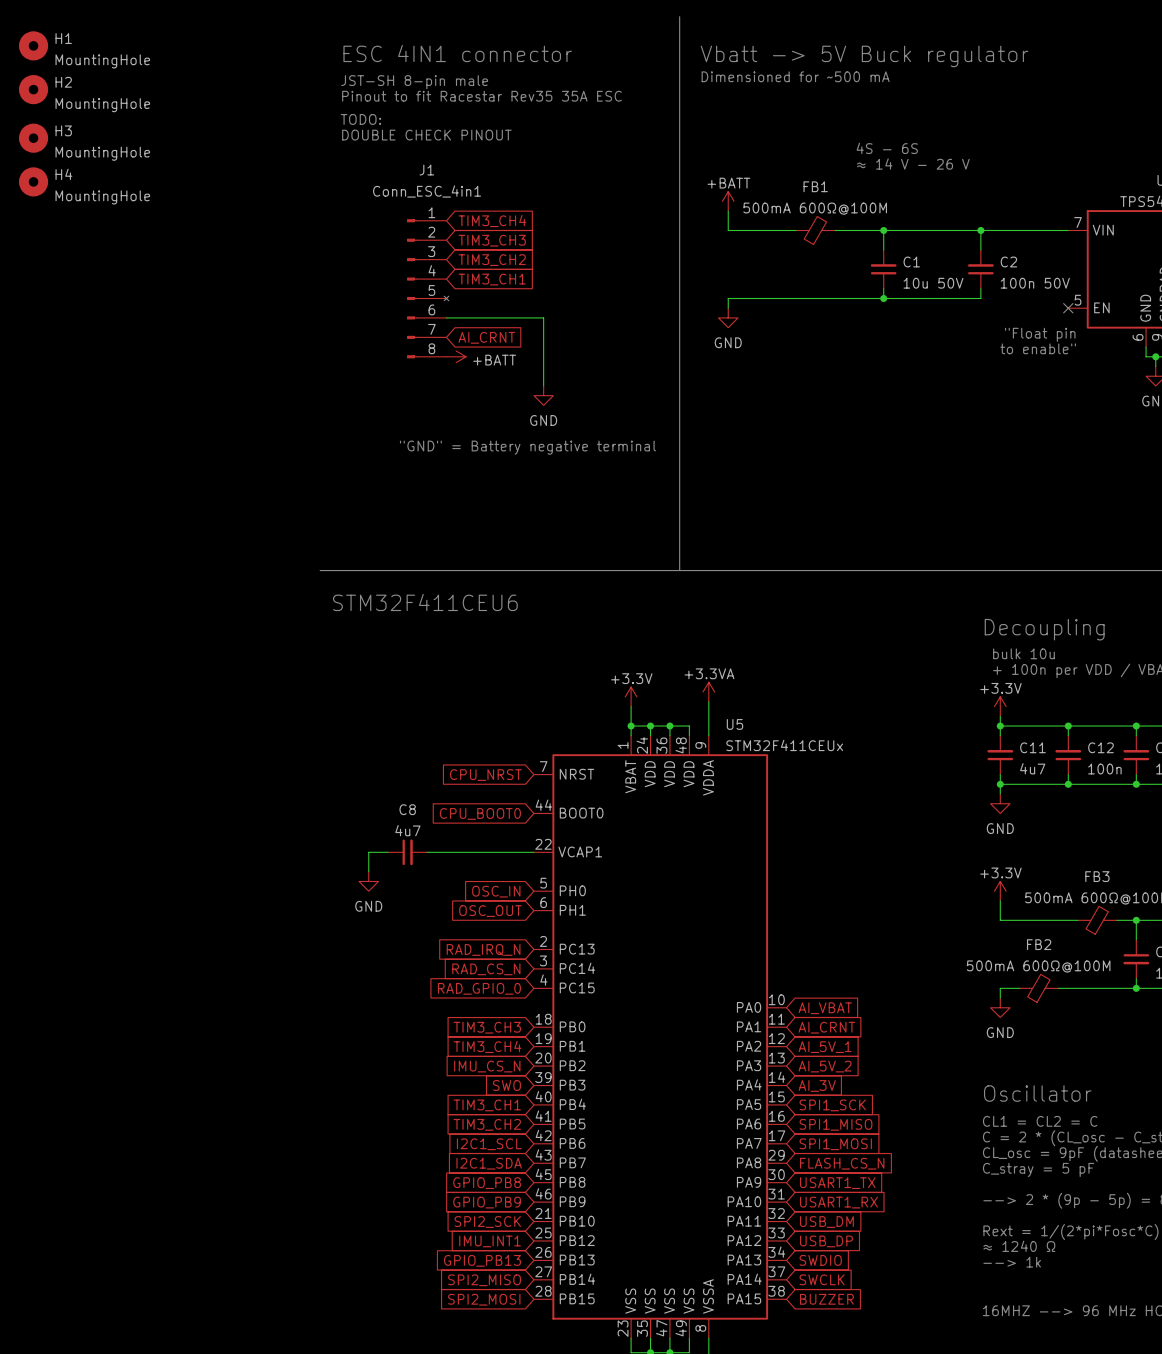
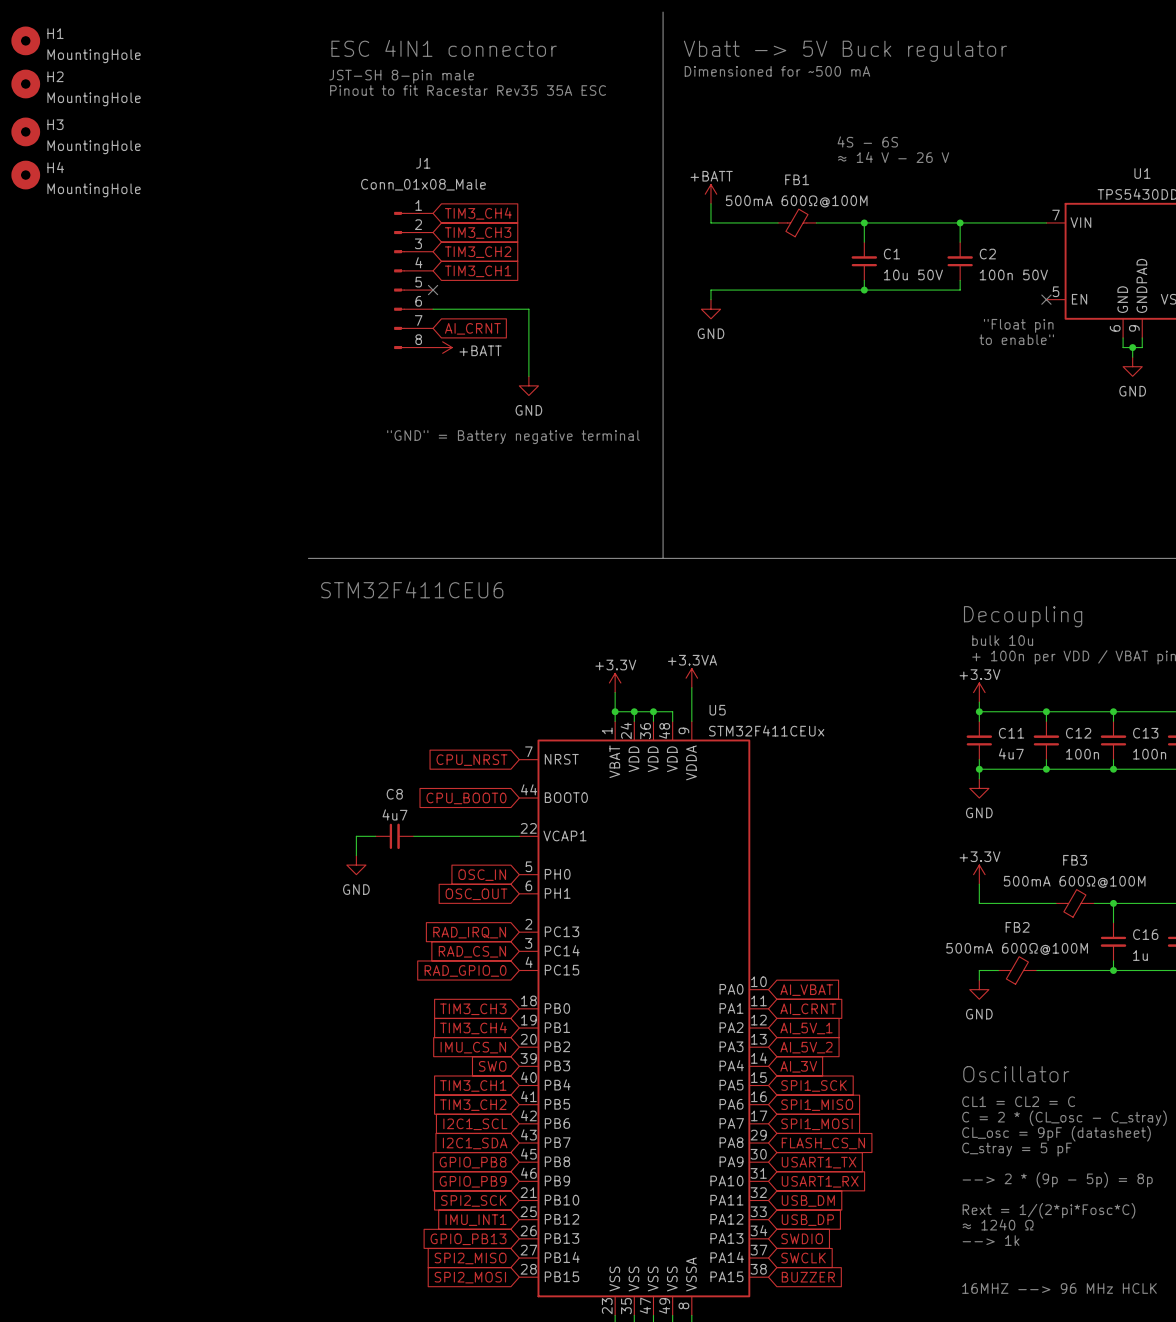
text: TODO: (360, 119) -> none
text: DOUBLE CHECK PINOUT (426, 135) -> none
J1 value: Conn_ESC_4in1 (427, 191) -> Conn_01x08_Male (423, 184)
J1 symbol: [407, 219, 449, 359] -> [394, 211, 434, 350]
no-connect mark: none -> (433, 290)

